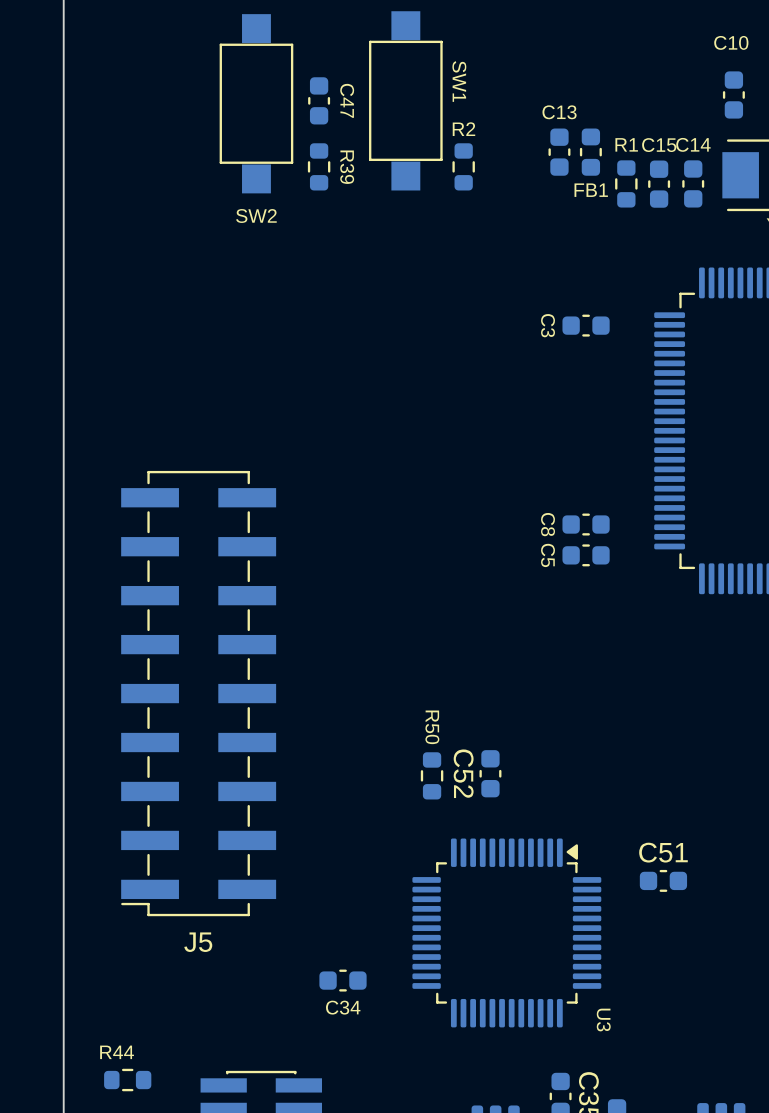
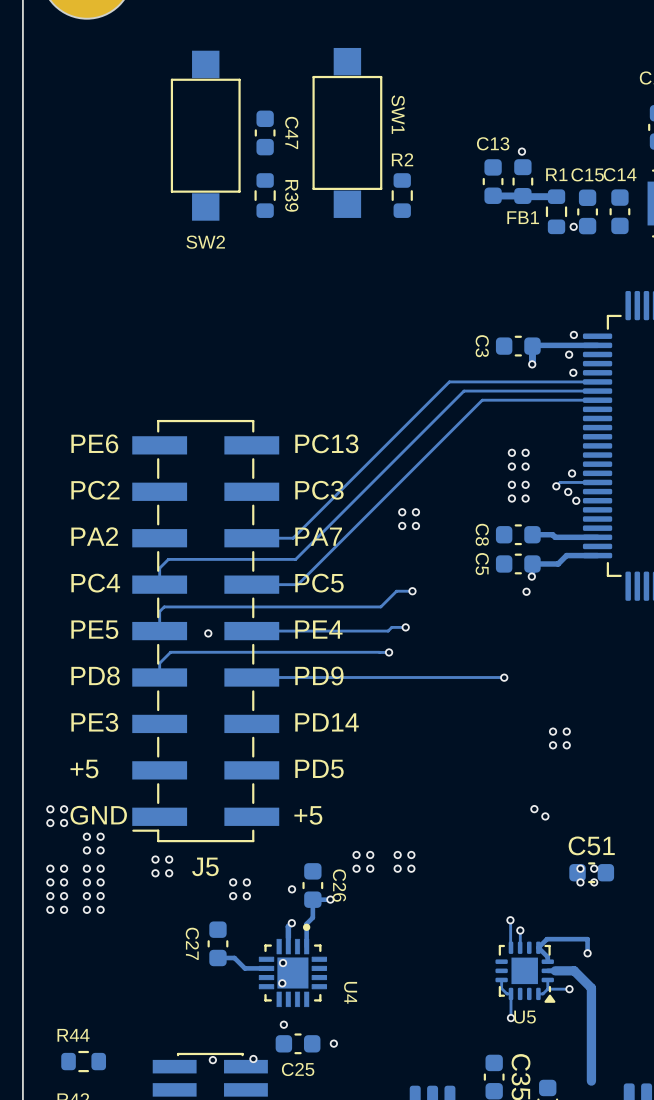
via: none -> (521, 151)
track: none -> (493, 195) (556, 196)
via: none -> (573, 226)
via: none -> (573, 334)
track: none -> (597, 345) (533, 345) (532, 364)
via: none -> (569, 354)
via: none -> (532, 364)
via: none -> (573, 372)
track: none -> (597, 381) (449, 381) (293, 538) (251, 538)
track: none -> (597, 391) (464, 391) (295, 559) (168, 559) (159, 568) (159, 584)
track: none -> (597, 400) (482, 400) (297, 584) (251, 584)
text: none -> PE6 (94, 443)
text: none -> PC13 (326, 443)
via: none -> (511, 452)
via: none -> (525, 452)
via: none -> (511, 466)
via: none -> (525, 466)
via: none -> (572, 473)
track: none -> (597, 482) (560, 482) (556, 486)
via: none -> (511, 484)
via: none -> (525, 484)
via: none -> (556, 486)
text: none -> PC2 (95, 490)
text: none -> PC3 (319, 490)
via: none -> (568, 491)
via: none -> (511, 498)
via: none -> (525, 498)
via: none -> (576, 500)
via: none -> (402, 512)
via: none -> (415, 512)
via: none -> (402, 525)
via: none -> (415, 525)
track: none -> (532, 534) (552, 534) (555, 537) (597, 537)
text: none -> PA2 (94, 536)
text: none -> PA7 (318, 536)
track: none -> (597, 555) (566, 555) (558, 563) (532, 563) (531, 576)
via: none -> (531, 576)
text: none -> PC4 (95, 583)
text: none -> PC5 (319, 583)
track: none -> (412, 591) (396, 591) (380, 606) (164, 606) (159, 611) (159, 631)
via: none -> (412, 591)
via: none -> (526, 591)
track: none -> (405, 627) (391, 627) (388, 631) (251, 631)
via: none -> (405, 627)
text: none -> PE5 (94, 629)
text: none -> PE4 (318, 629)
via: none -> (208, 633)
track: none -> (379, 652) (170, 652) (159, 663) (159, 677)
track: none -> (389, 652) (379, 652)
via: none -> (389, 652)
text: none -> PD8 (95, 675)
text: none -> PD9 (319, 675)
track: none -> (501, 677) (251, 677)
via: none -> (504, 677)
J5 position: (198, 693) -> (205, 631)
text: none -> PE3 (94, 722)
text: none -> PD14 (327, 722)
via: none -> (553, 731)
via: none -> (566, 731)
via: none -> (553, 745)
via: none -> (566, 745)
text: none -> +5 (84, 768)
text: none -> PD5 (319, 768)
C52: (490, 773) -> none
R50: (432, 775) -> none
via: none -> (534, 809)
via: none -> (50, 809)
via: none -> (64, 809)
text: none -> GND (98, 815)
text: none -> +5 (308, 815)
via: none -> (545, 816)
via: none -> (50, 823)
via: none -> (64, 823)
via: none -> (86, 836)
via: none -> (100, 836)
via: none -> (86, 850)
via: none -> (100, 850)
via: none -> (356, 854)
via: none -> (370, 854)
via: none -> (397, 854)
via: none -> (411, 854)
via: none -> (155, 859)
via: none -> (169, 859)
via: none -> (50, 868)
via: none -> (64, 868)
via: none -> (86, 868)
via: none -> (100, 868)
via: none -> (356, 868)
via: none -> (370, 868)
via: none -> (397, 868)
via: none -> (411, 868)
via: none -> (580, 868)
via: none -> (594, 868)
via: none -> (155, 873)
via: none -> (169, 873)
via: none -> (50, 882)
via: none -> (64, 882)
via: none -> (86, 882)
via: none -> (100, 882)
via: none -> (233, 882)
via: none -> (246, 882)
via: none -> (580, 882)
via: none -> (594, 882)
C26: none -> (312, 885)
via: none -> (292, 889)
via: none -> (50, 896)
via: none -> (64, 896)
via: none -> (86, 896)
via: none -> (100, 896)
via: none -> (233, 896)
via: none -> (246, 896)
track: none -> (330, 899) (312, 899) (312, 917) (306, 923) (306, 946)
via: none -> (330, 899)
via: none -> (50, 909)
via: none -> (64, 909)
via: none -> (86, 909)
via: none -> (100, 909)
track: none -> (510, 920) (511, 947)
via: none -> (510, 920)
U3: (506, 932) -> none
track: none -> (291, 923) (288, 926) (288, 937)
via: none -> (291, 923)
track: none -> (520, 930) (520, 947)
via: none -> (520, 930)
C27: none -> (217, 943)
track: none -> (587, 953) (587, 939) (547, 939) (538, 947) (547, 957) (547, 961)
via: none -> (587, 953)
track: none -> (217, 958) (234, 958) (244, 968) (266, 968)
via: none -> (283, 963)
U4: none -> (292, 965)
C34: (343, 980) -> none
track: none -> (547, 970) (574, 970) (591, 988) (591, 1081)
U5: none -> (525, 972)
track: none -> (501, 979) (501, 988) (506, 993) (511, 993) (511, 1018)
track: none -> (547, 979) (547, 989) (542, 993) (538, 993)
via: none -> (282, 983)
track: none -> (569, 989) (547, 989)
via: none -> (569, 989)
via: none -> (511, 1018)
via: none -> (283, 1024)
C25: none -> (298, 1043)
via: none -> (333, 1043)
via: none -> (253, 1058)
via: none -> (212, 1060)

